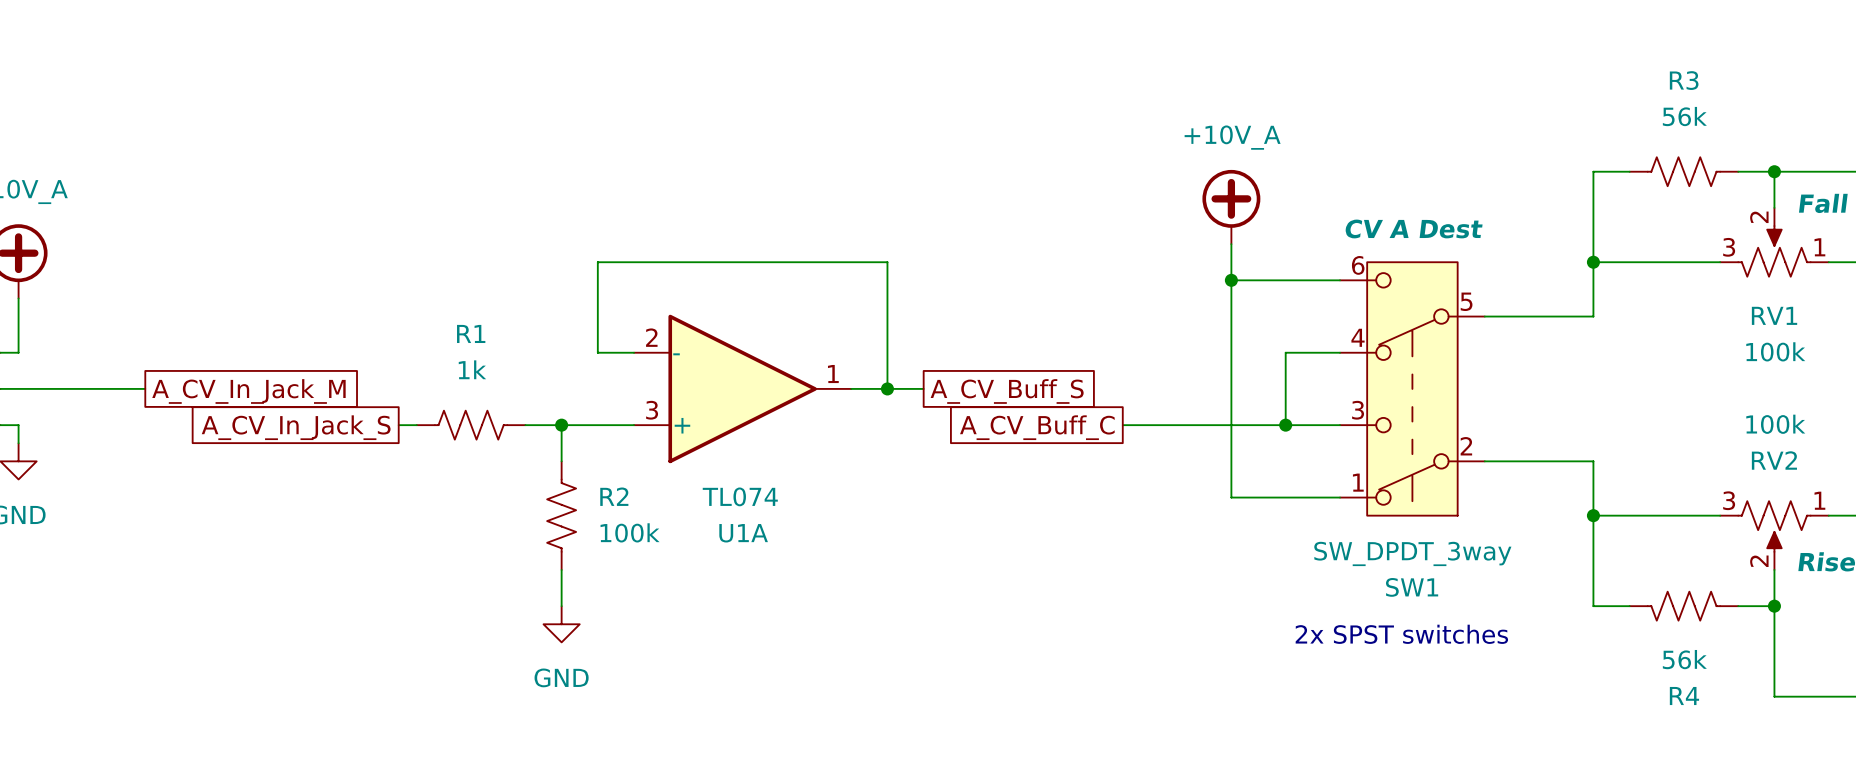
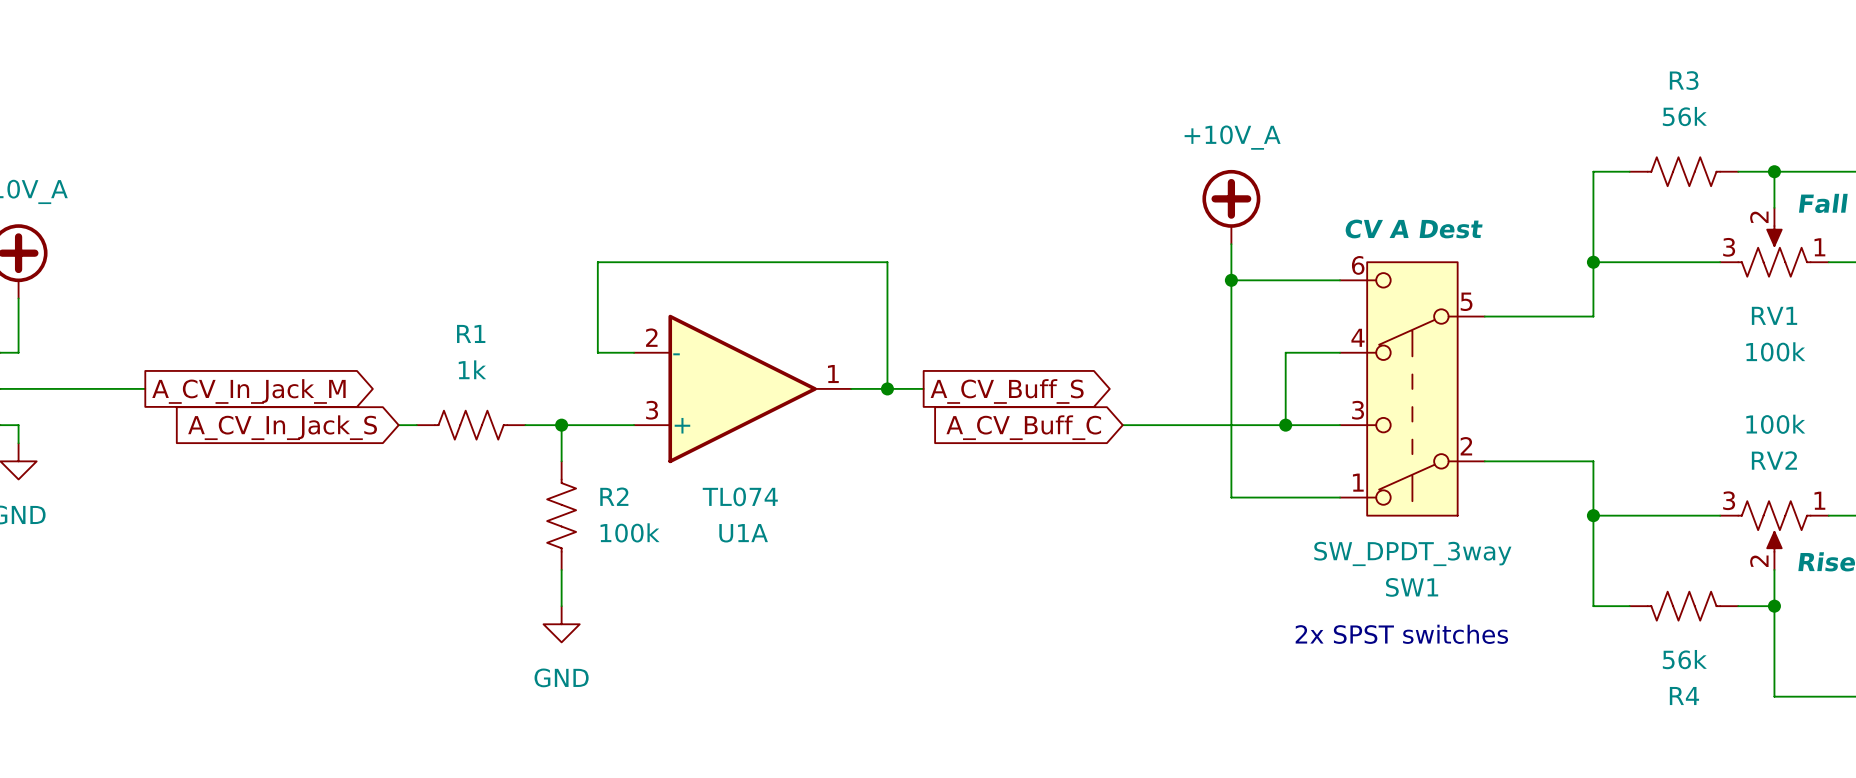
global label shape: passive (248, 391) -> output (248, 391)
global label shape: passive (1007, 391) -> output (1007, 391)
global label shape: passive (296, 427) -> input (282, 427)
global label shape: passive (1037, 427) -> input (1023, 427)

